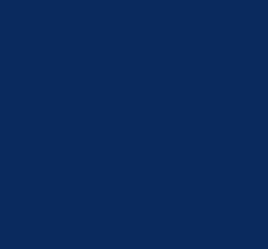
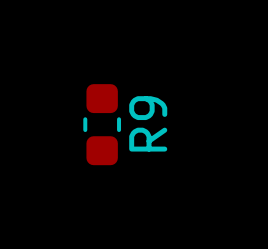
R9: none -> (102, 124)

